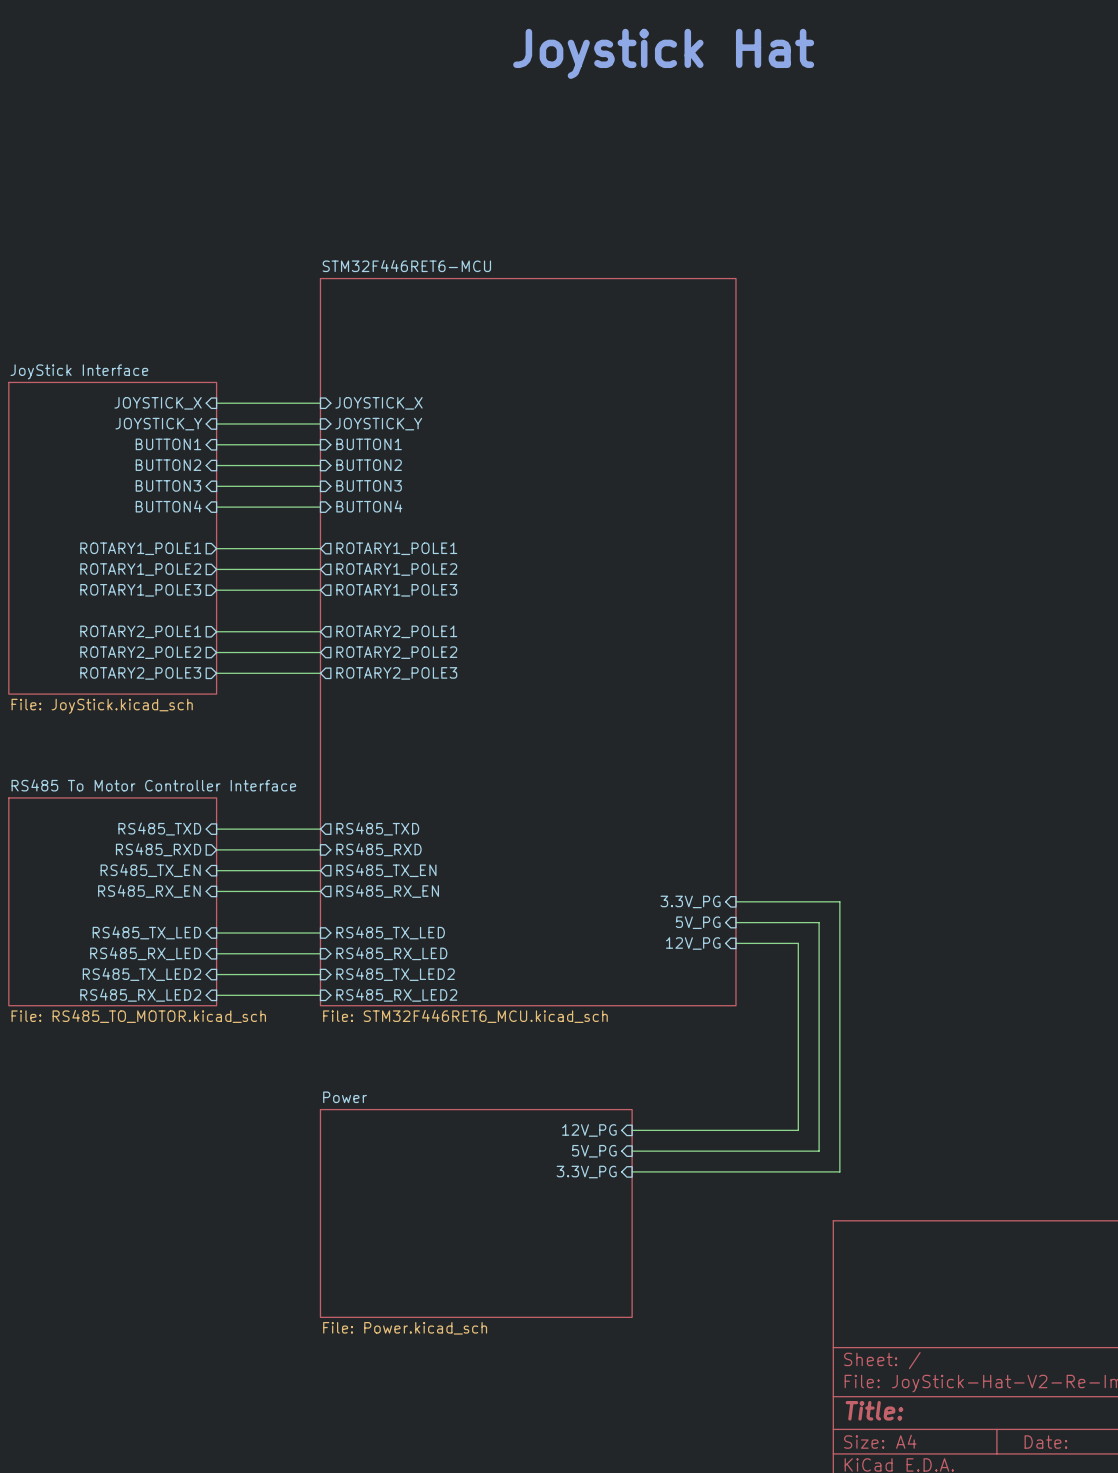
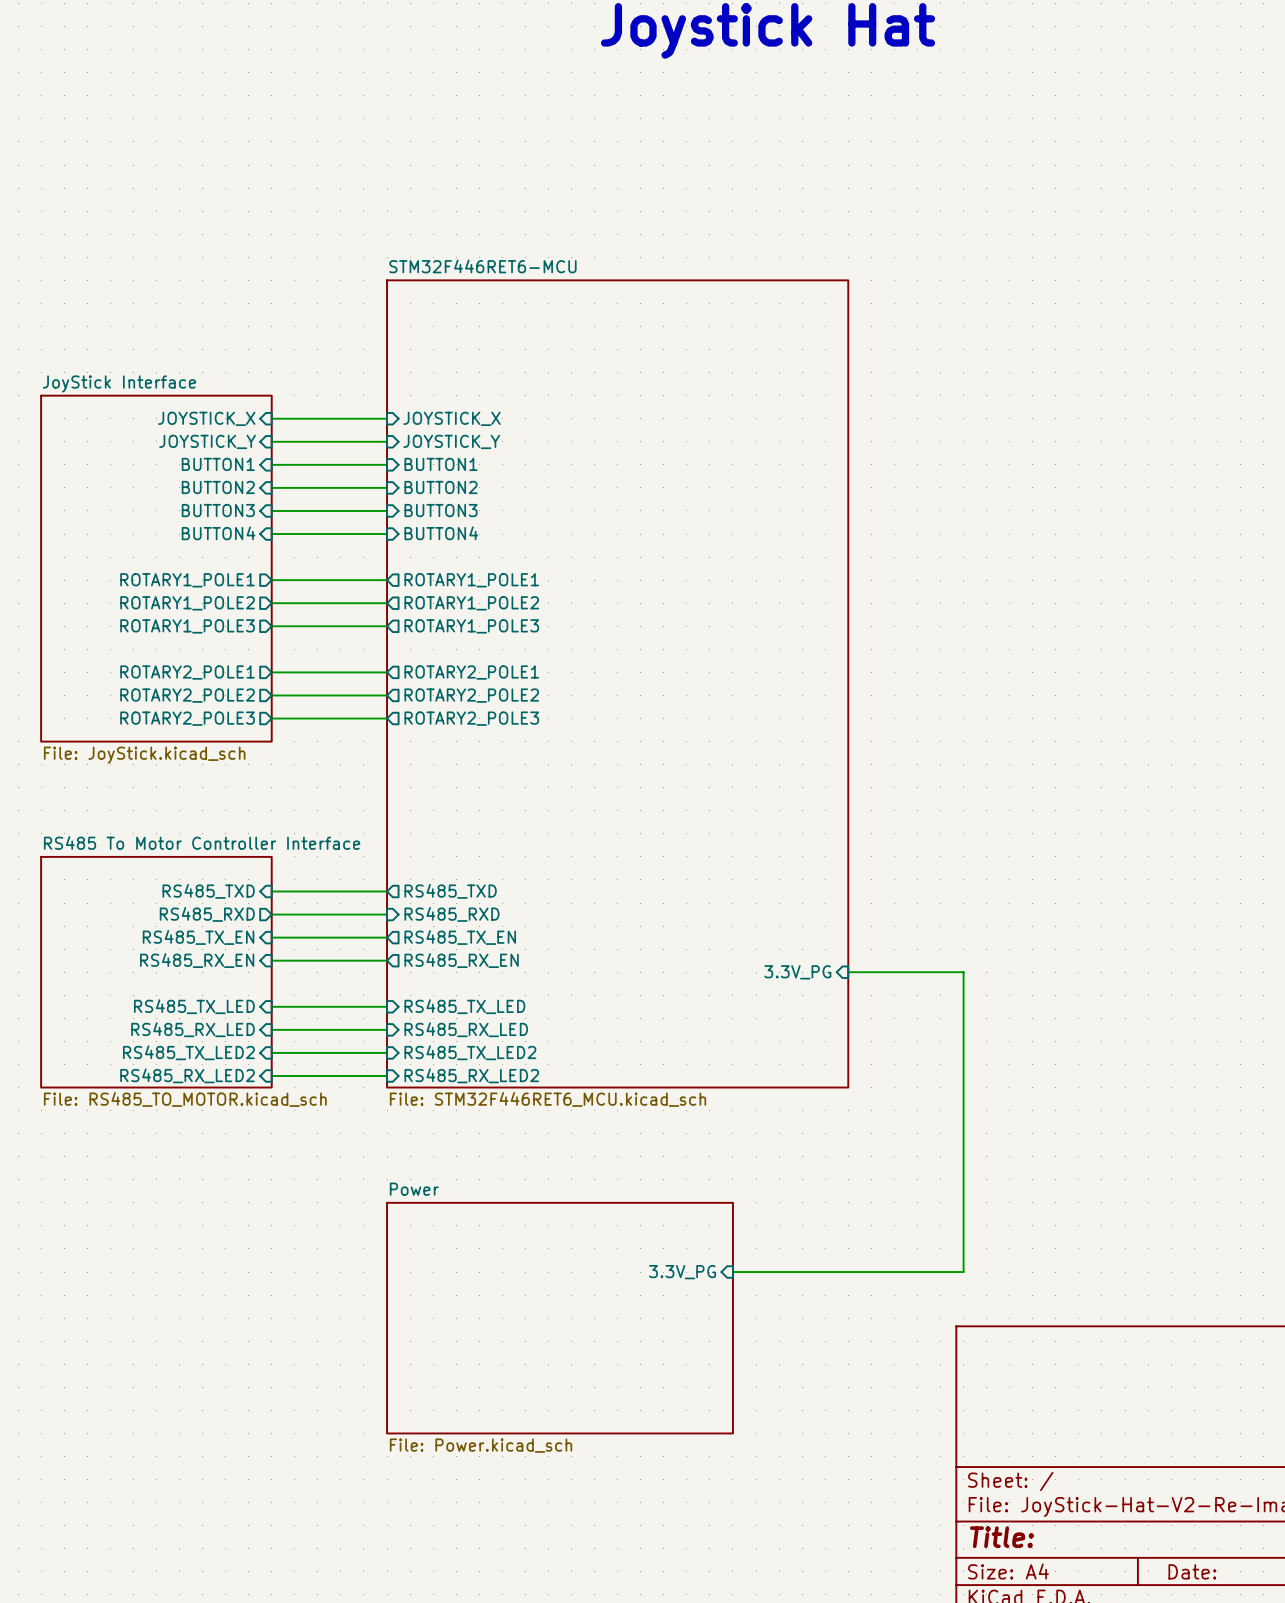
sheet pin: 5V_PG (698, 922) -> none
wire: (735, 922) (819, 922) (819, 1151) (632, 1151) -> none
sheet pin: 12V_PG (693, 943) -> none
wire: (735, 943) (798, 943) (798, 1130) (632, 1130) -> none
sheet pin: 12V_PG (589, 1130) -> none
sheet pin: 5V_PG (594, 1151) -> none

